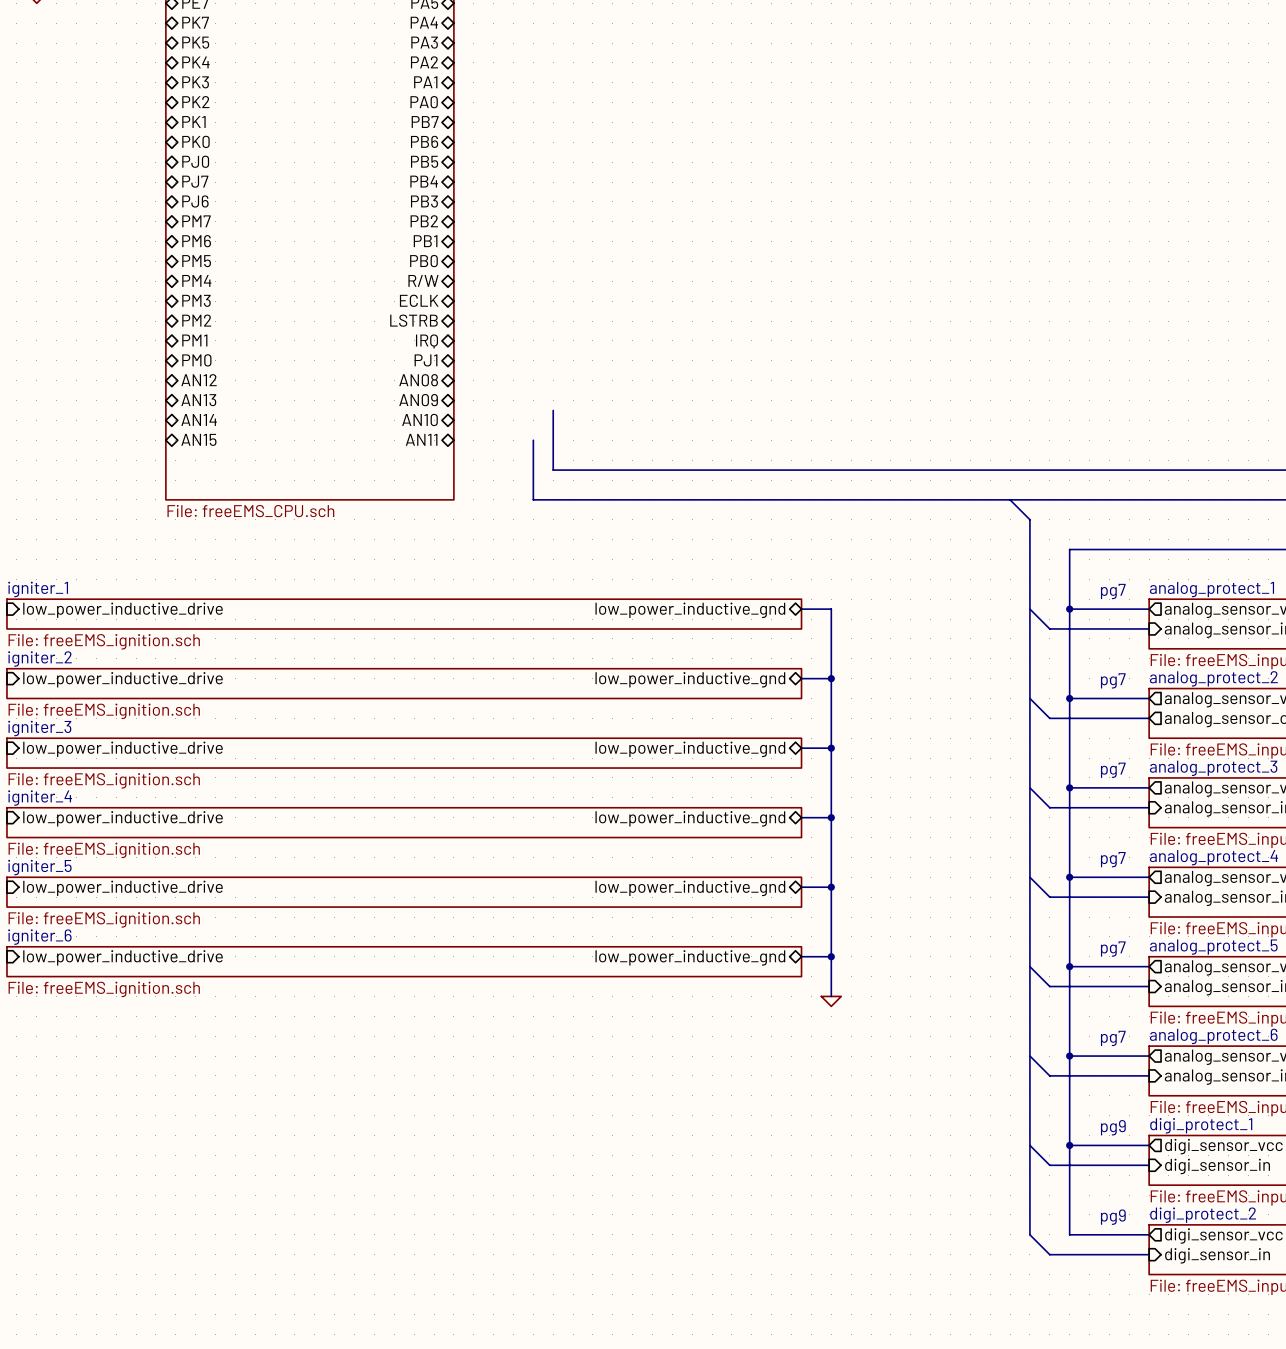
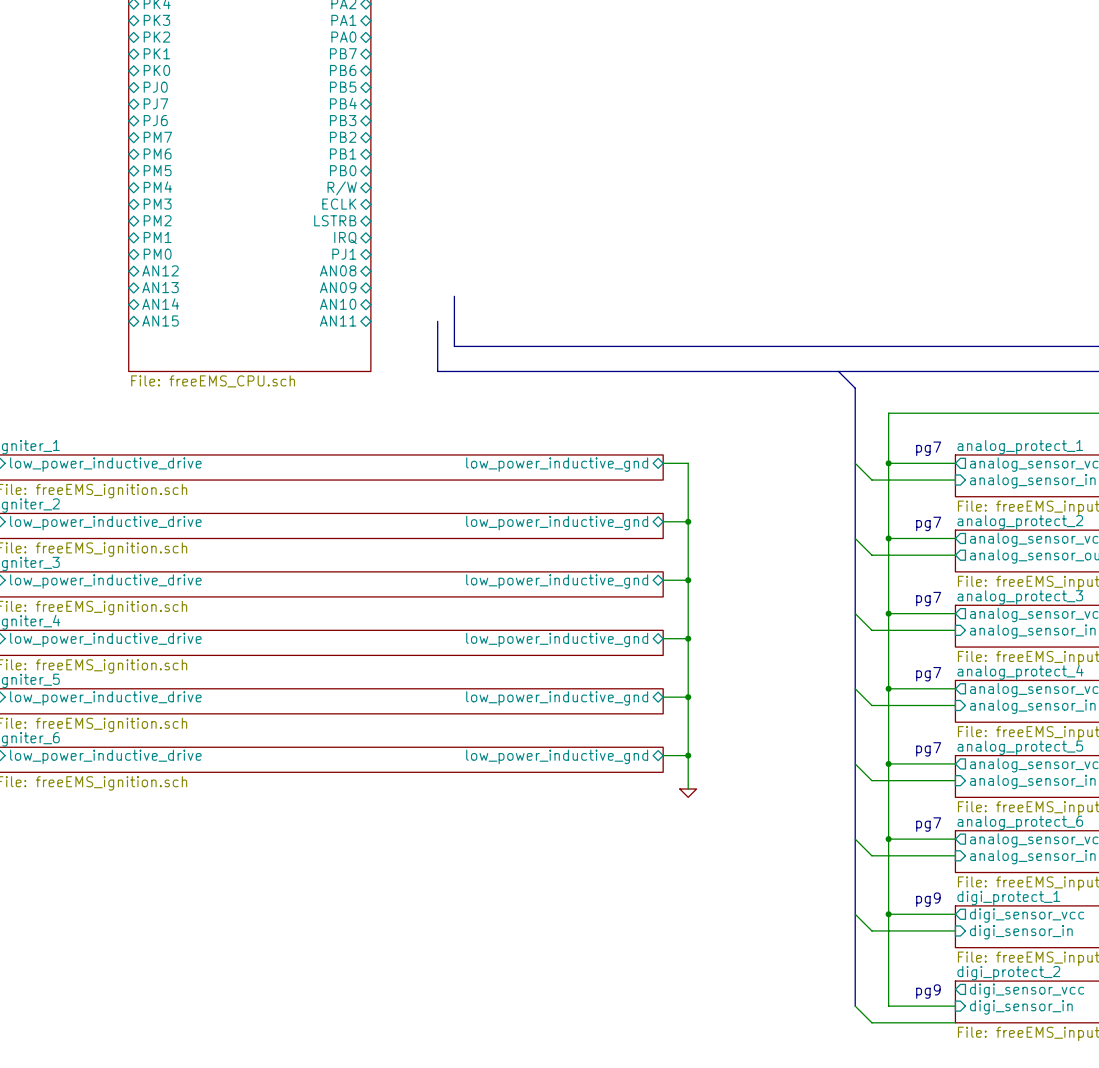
text position: pg9 (1113, 1217) -> pg9 (928, 991)
wire: (1029, 1234) (1049, 1254) (1069, 1254) -> (888, 989) (888, 1006)
bus: none -> (855, 989) (855, 1006)
wire: (1069, 1234) (1149, 1234) -> none
wire: none -> (855, 1006) (871, 1022) (955, 1022)

